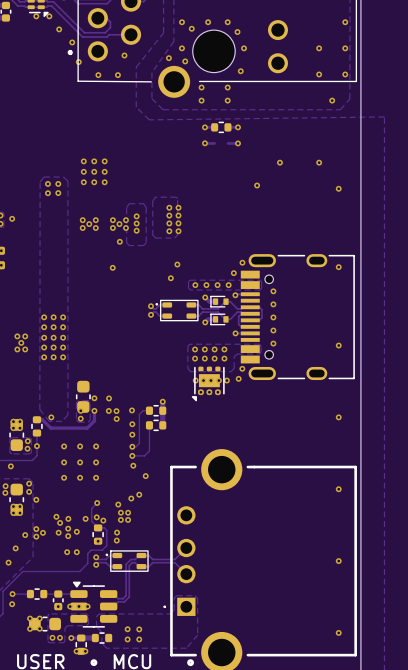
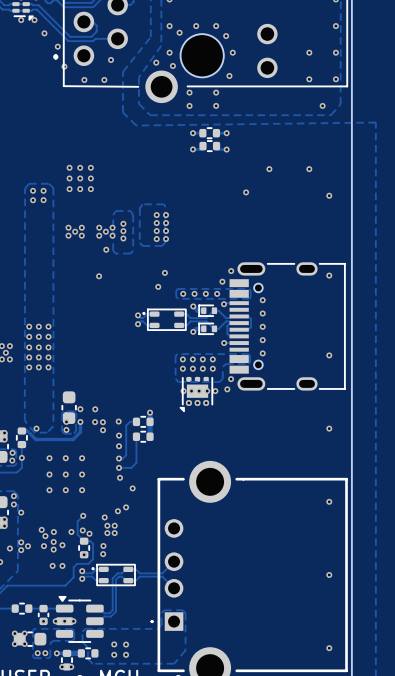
part: none -> (209, 146)

